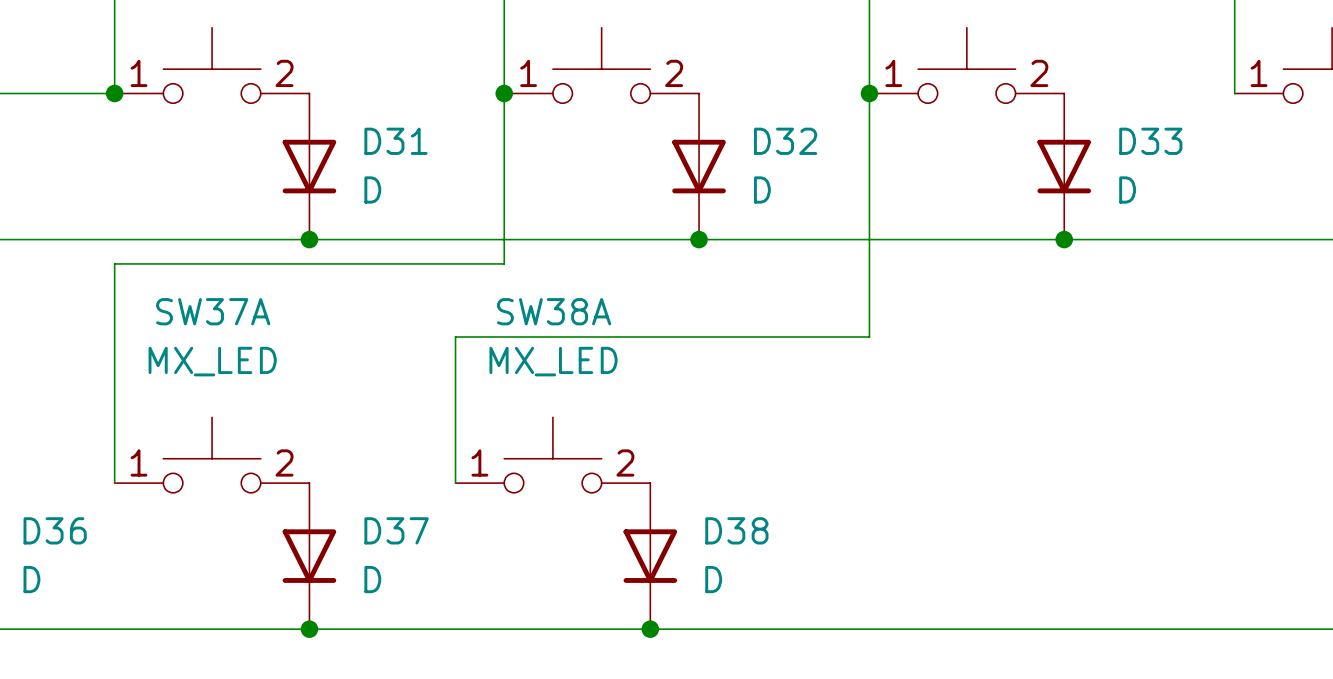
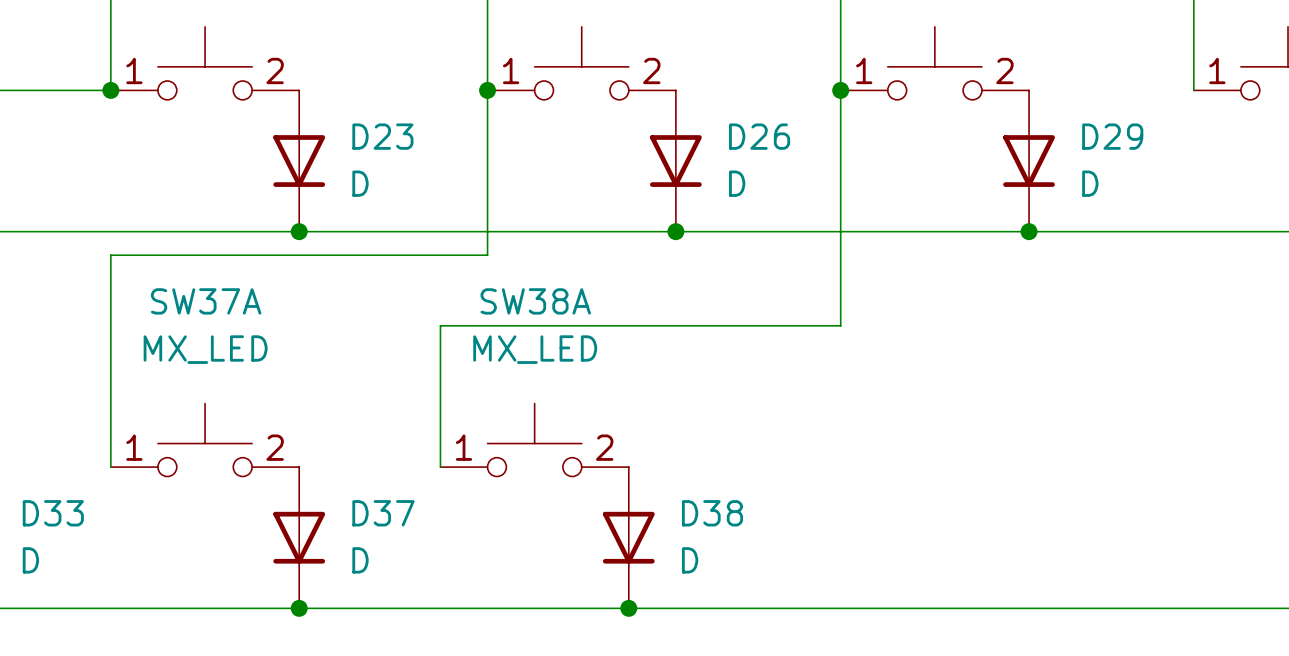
D31 name: D31 (396, 141) -> D23 (382, 136)
D32 name: D32 (785, 141) -> D26 (759, 136)
D33 name: D33 (1150, 141) -> D29 (1112, 136)
D36 name: D36 (55, 530) -> D33 (53, 513)

